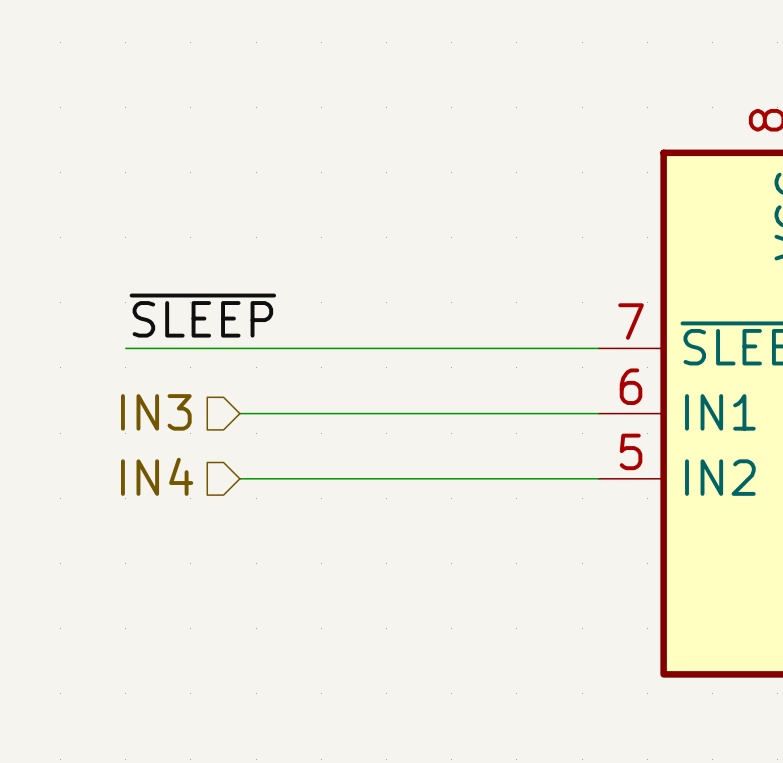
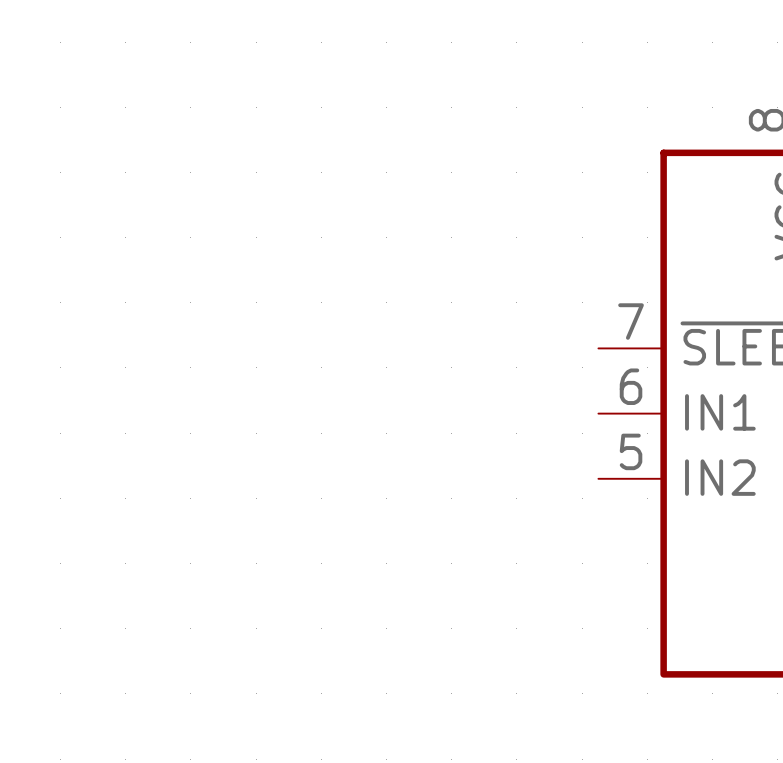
label: ~{SLEEP} (202, 315) -> none
wire: (125, 348) (598, 348) -> none
hierarchical label: IN3 (156, 412) -> none
wire: (239, 413) (598, 413) -> none
hierarchical label: IN4 (157, 476) -> none
wire: (239, 478) (598, 478) -> none

